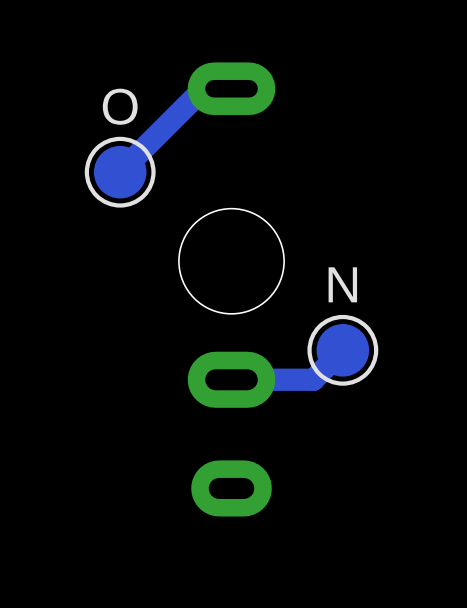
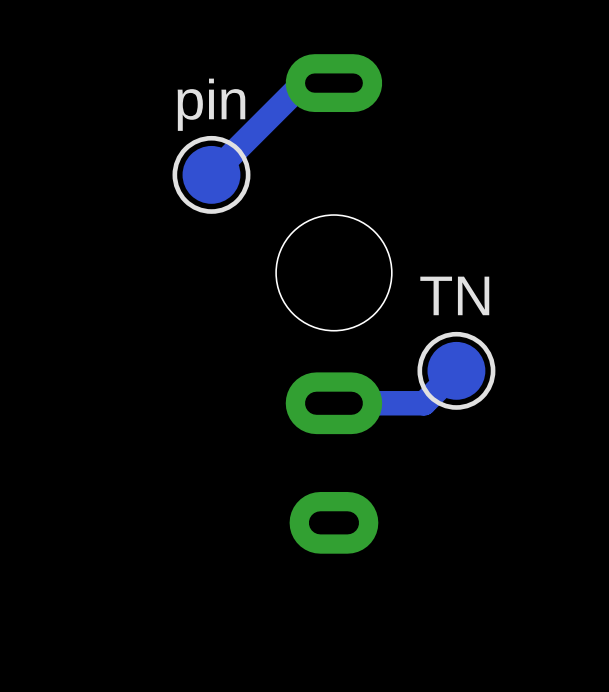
text: O (120, 106) -> pin (211, 104)
text: N (342, 284) -> TN (454, 295)

